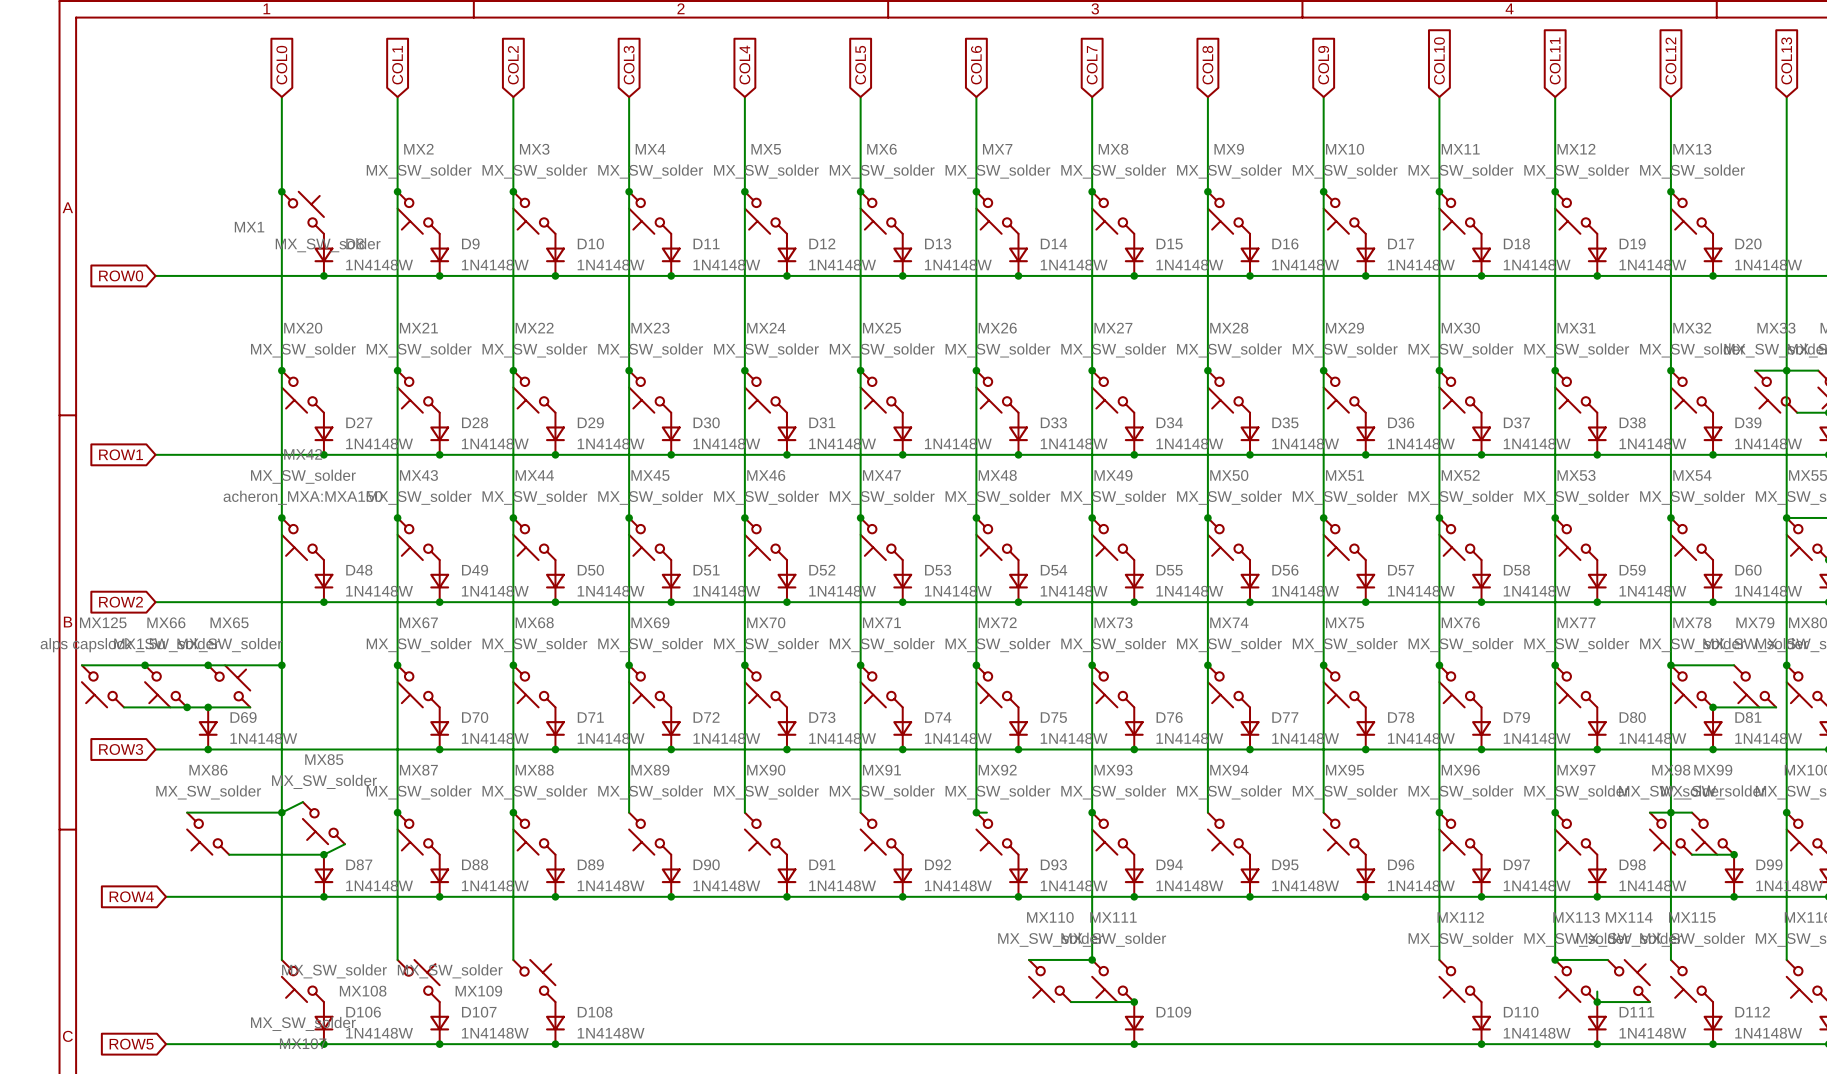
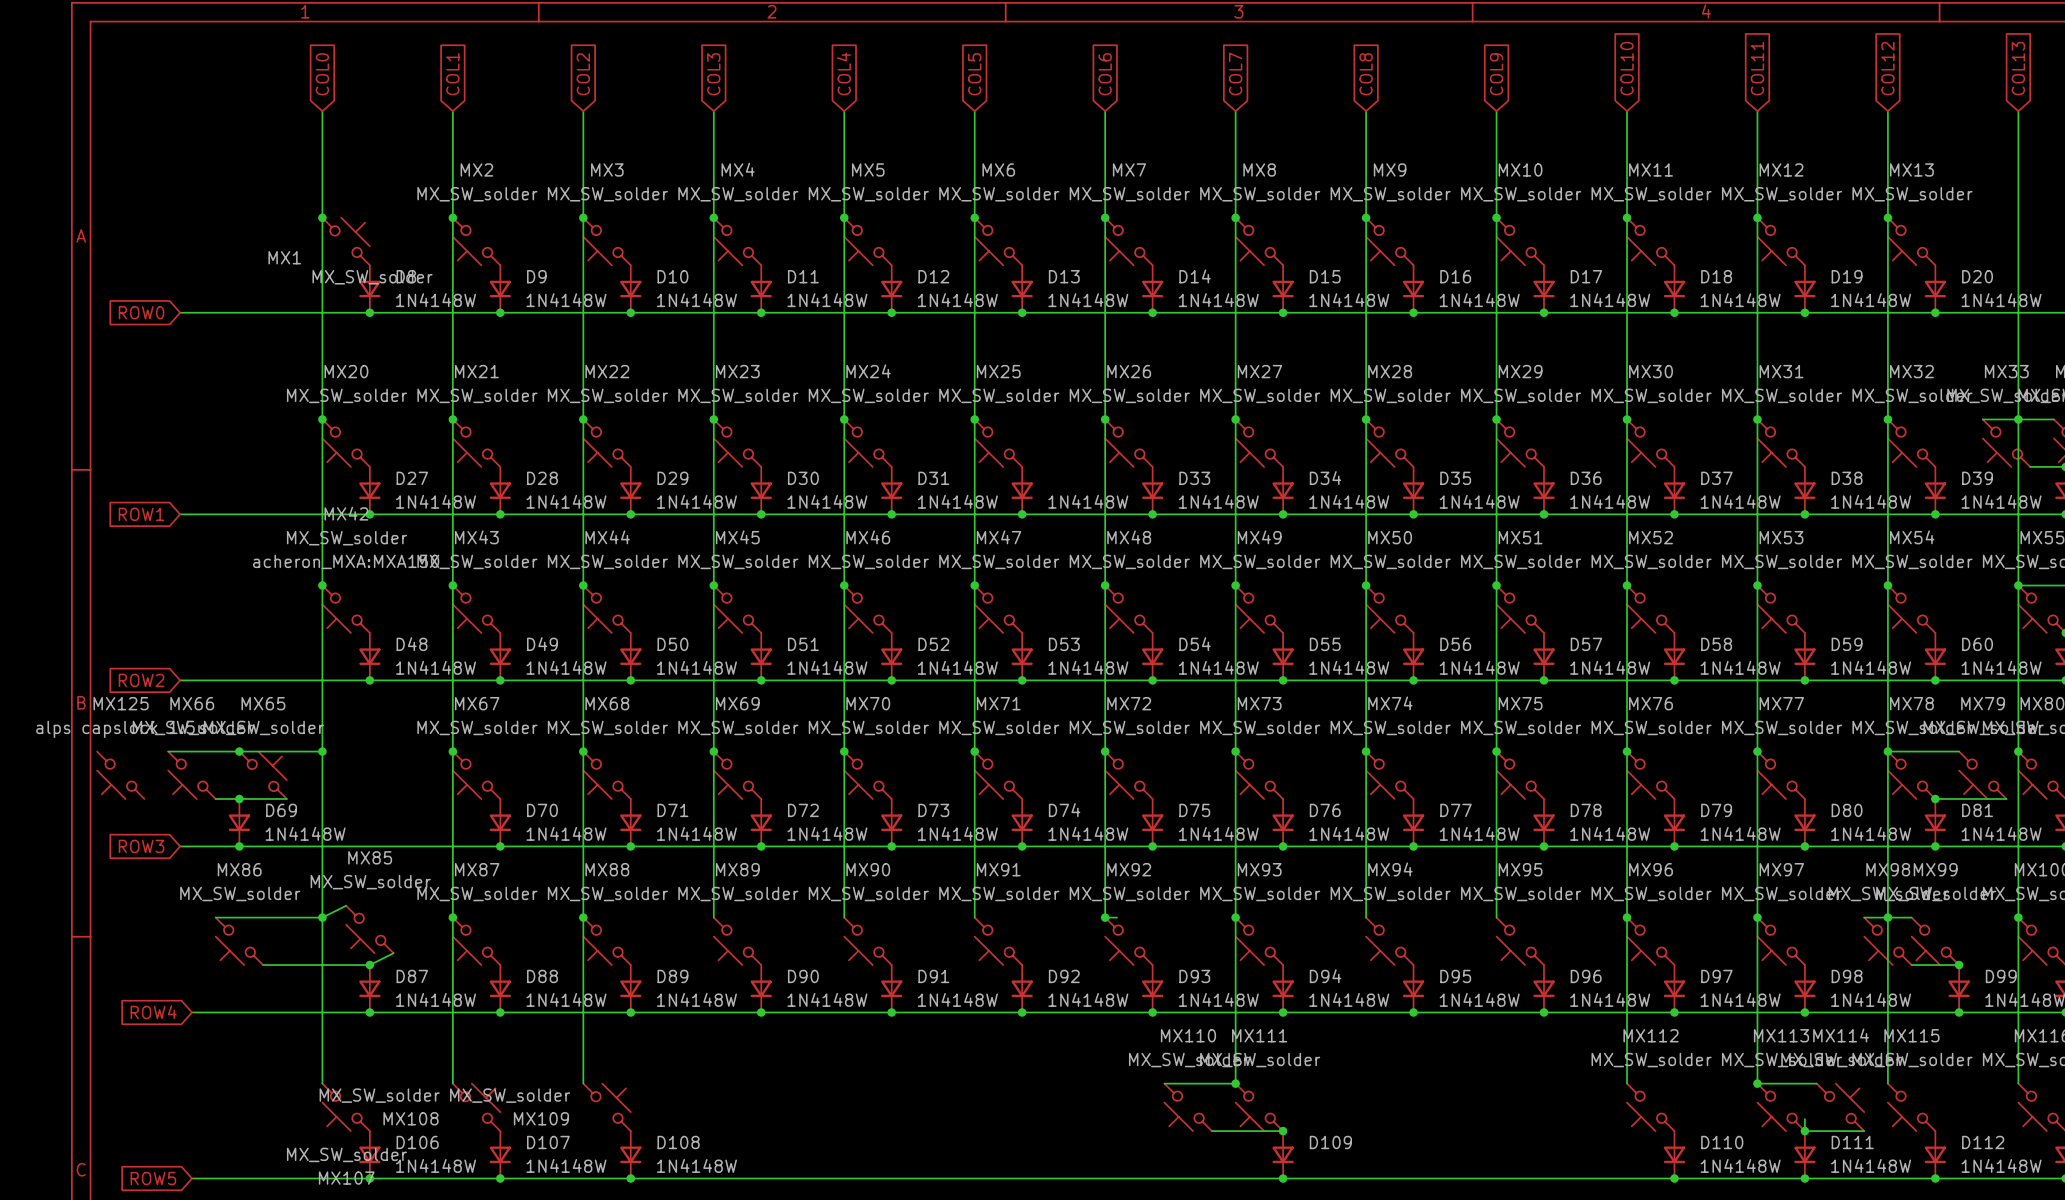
wire: (81, 665) (145, 665) -> none
junction: (145, 665) -> none
wire: (123, 707) (187, 707) -> none
junction: (187, 707) -> none

